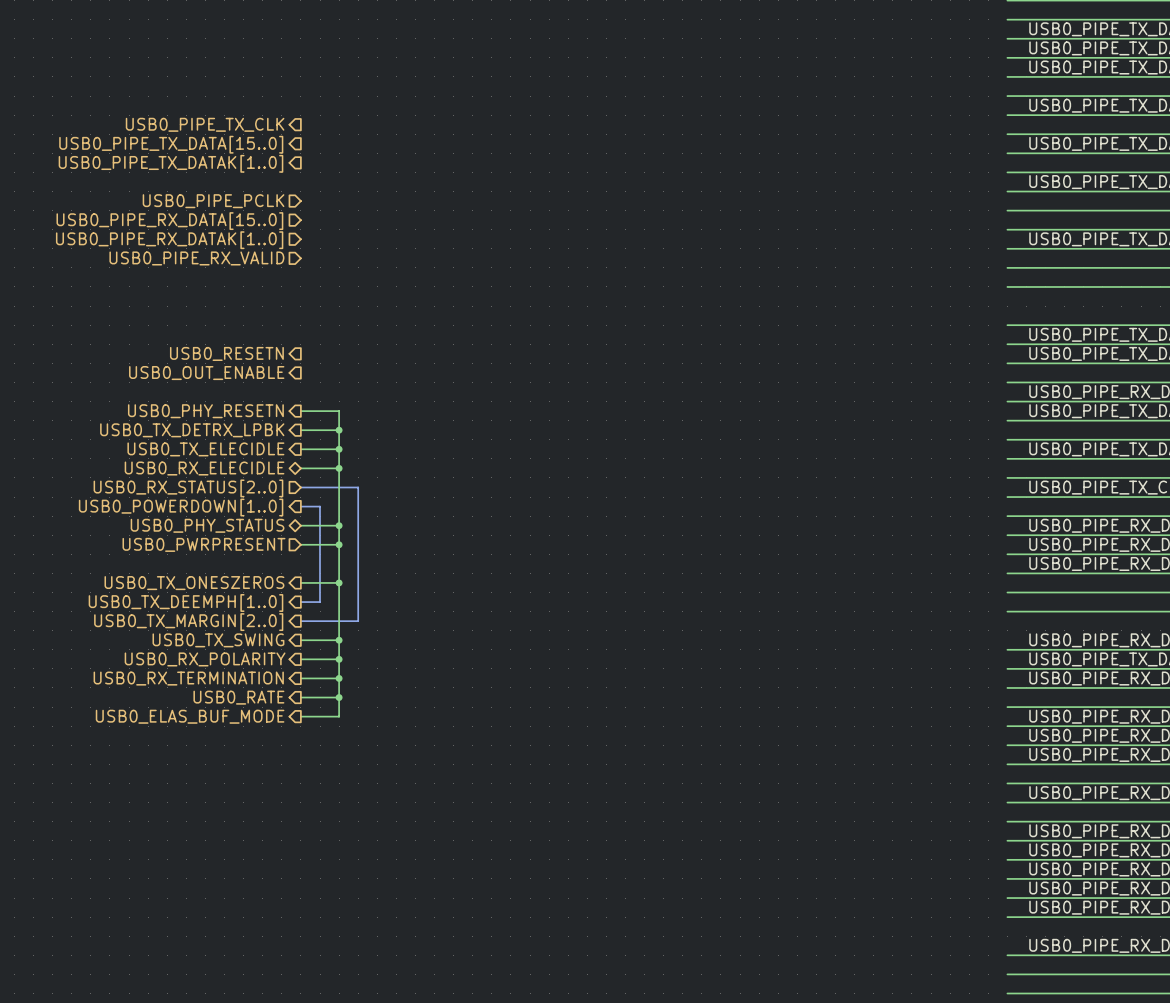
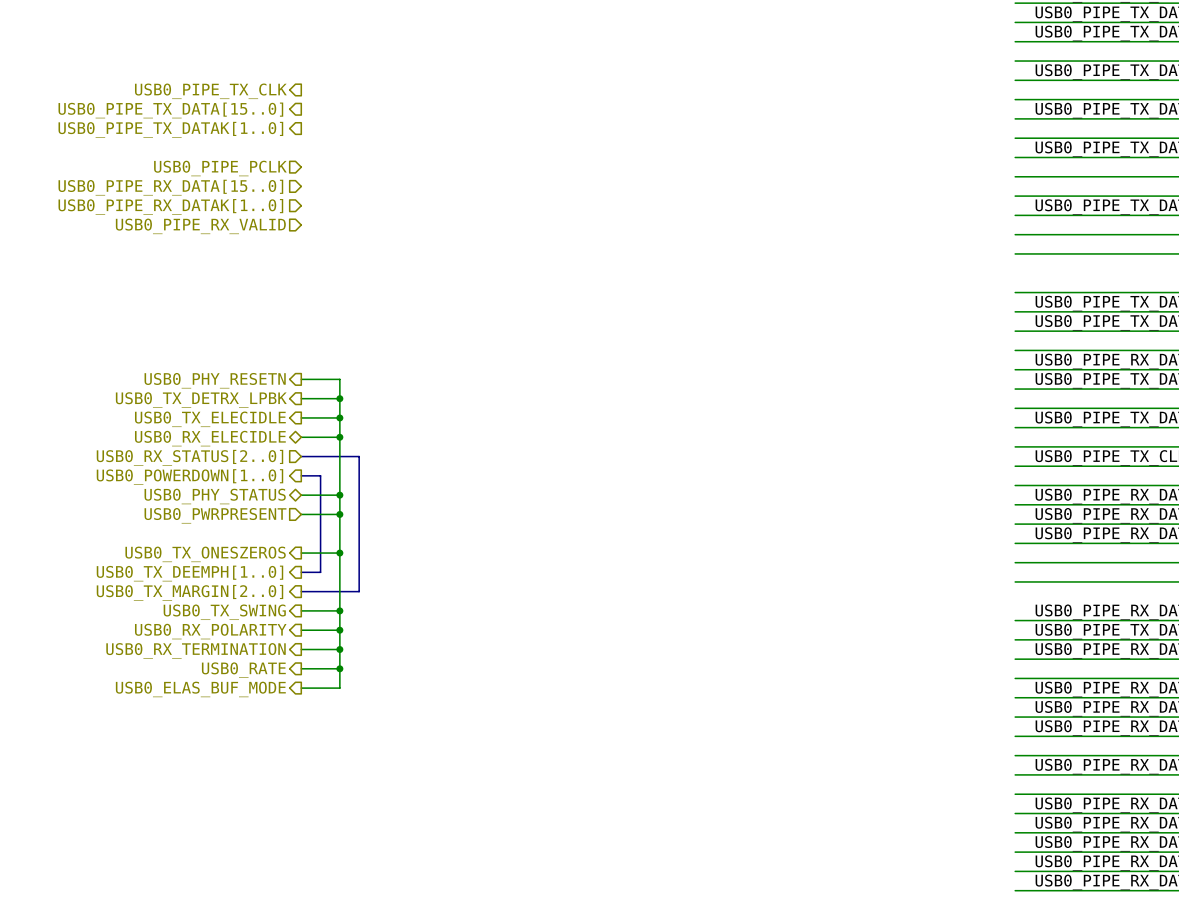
hierarchical label: USB0_RESETN (226, 353) -> none
hierarchical label: USB0_OUT_ENABLE (206, 373) -> none

